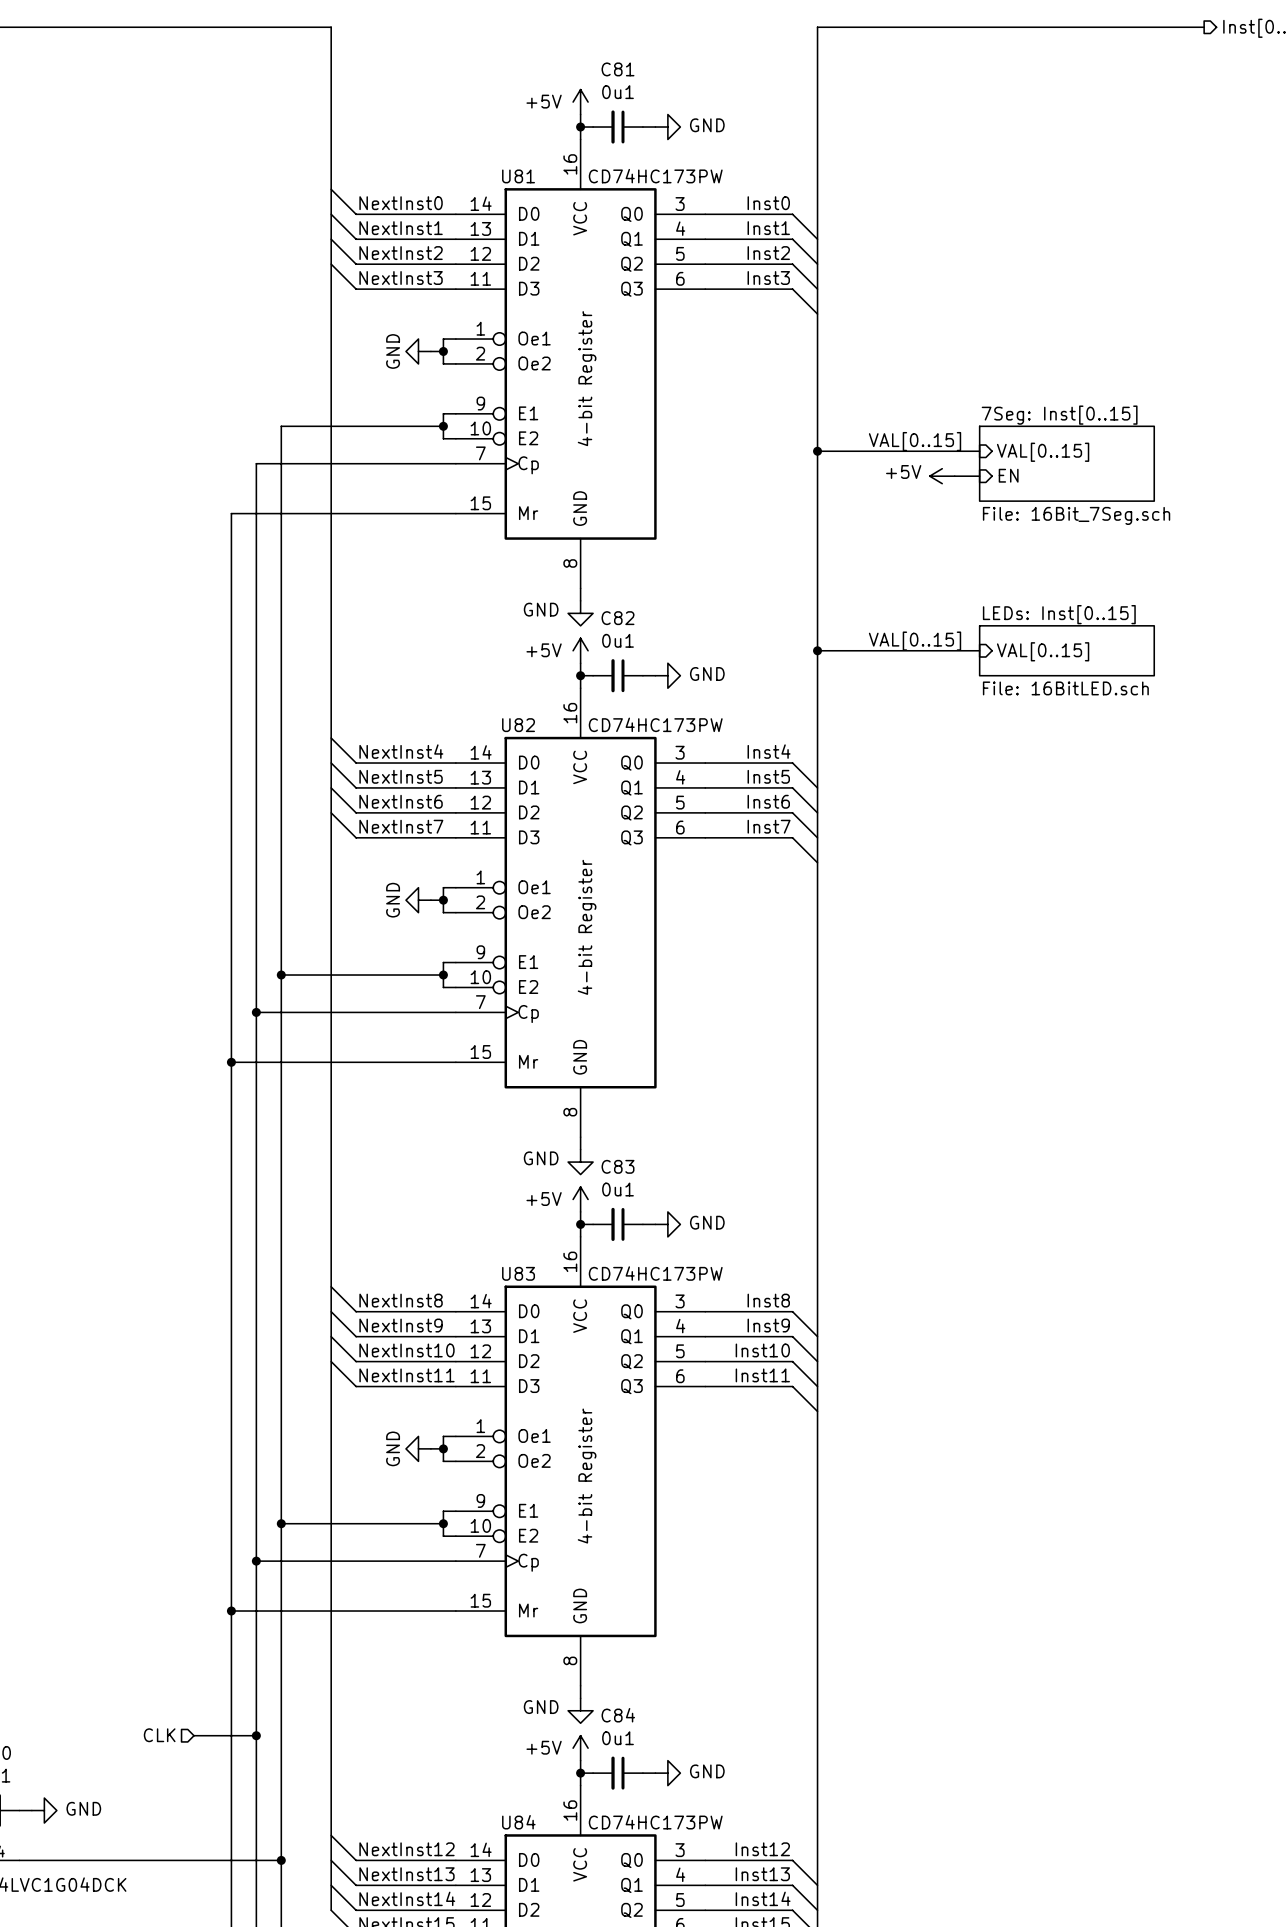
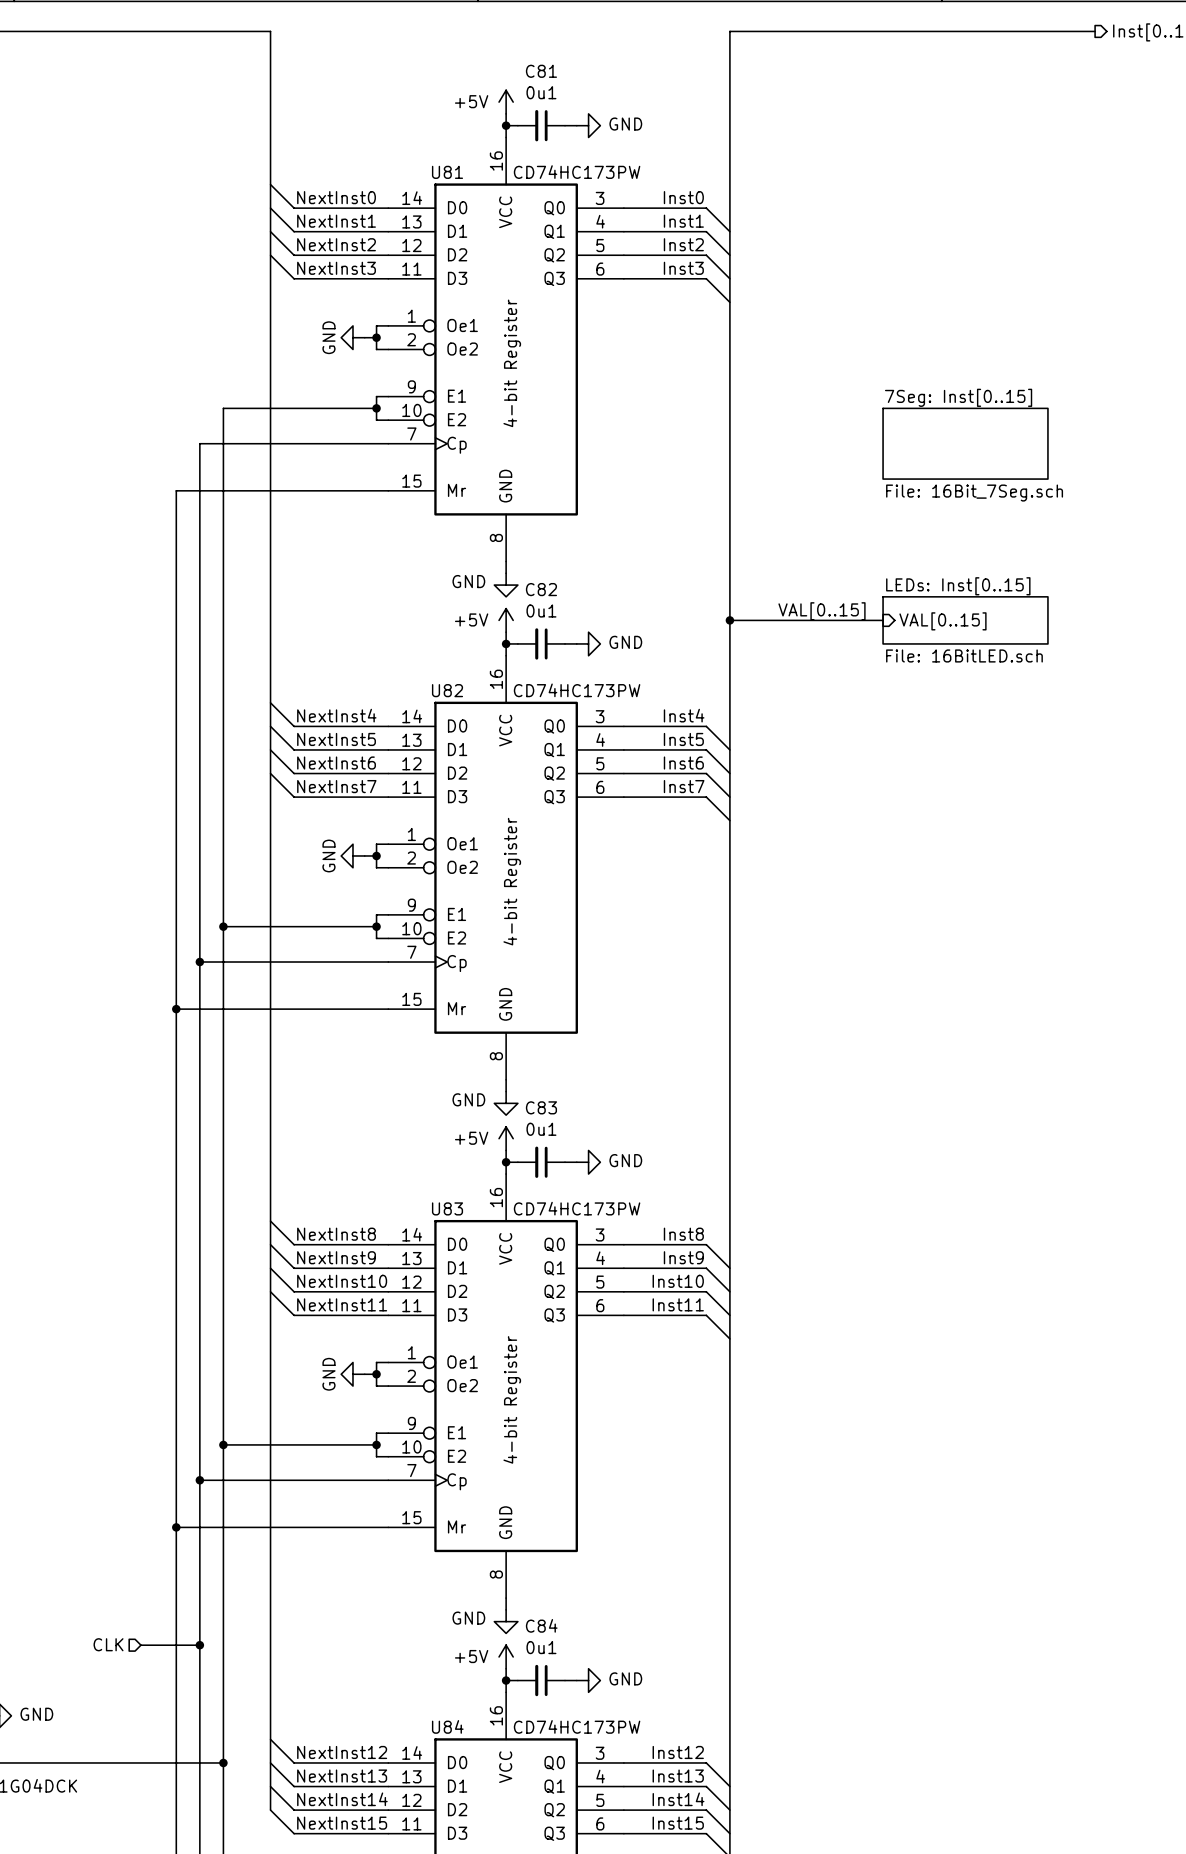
label: VAL[0..15] (915, 441) -> none
bus: (817, 451) (979, 451) -> none
junction: (817, 451) -> none
sheet pin: VAL[0..15] (1043, 452) -> none
sheet pin: EN (1008, 475) -> none
power symbol: +5V (942, 476) -> none
wire: (954, 476) (979, 476) -> none

